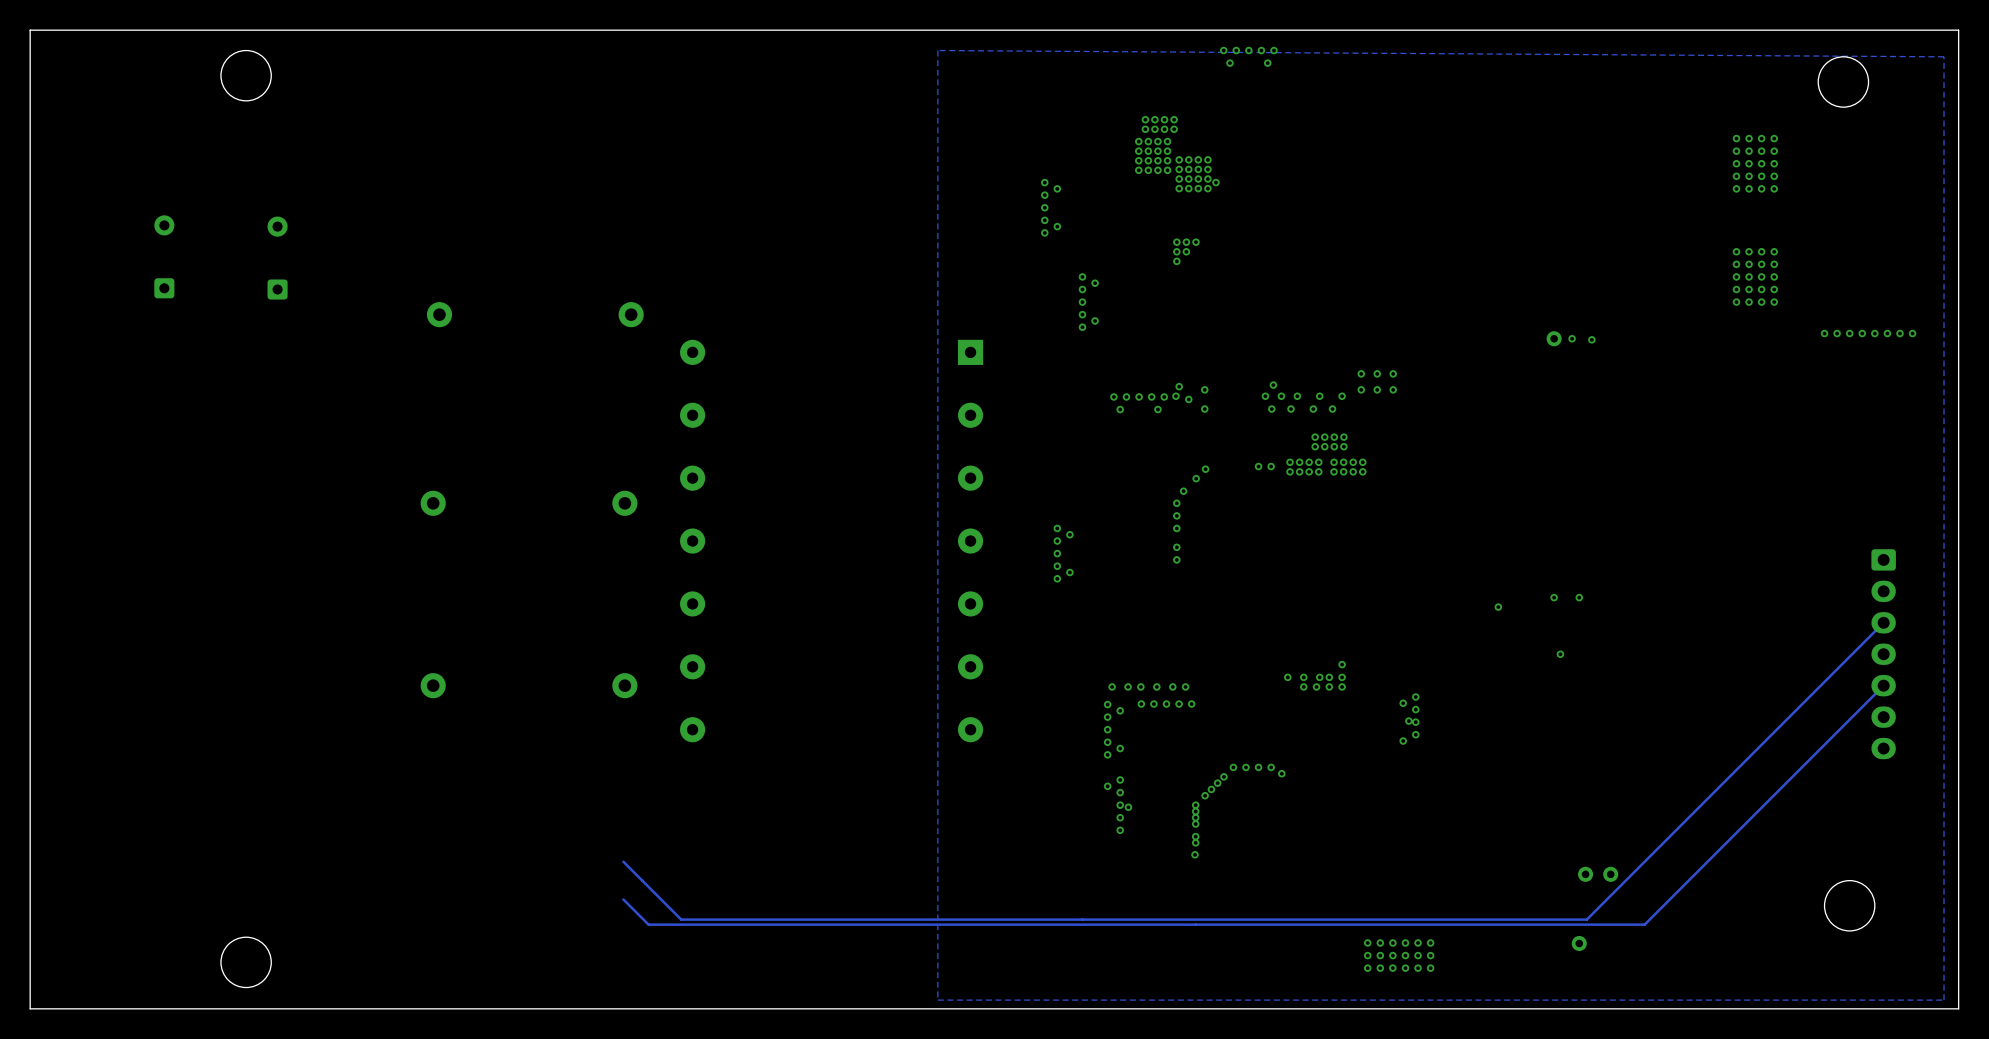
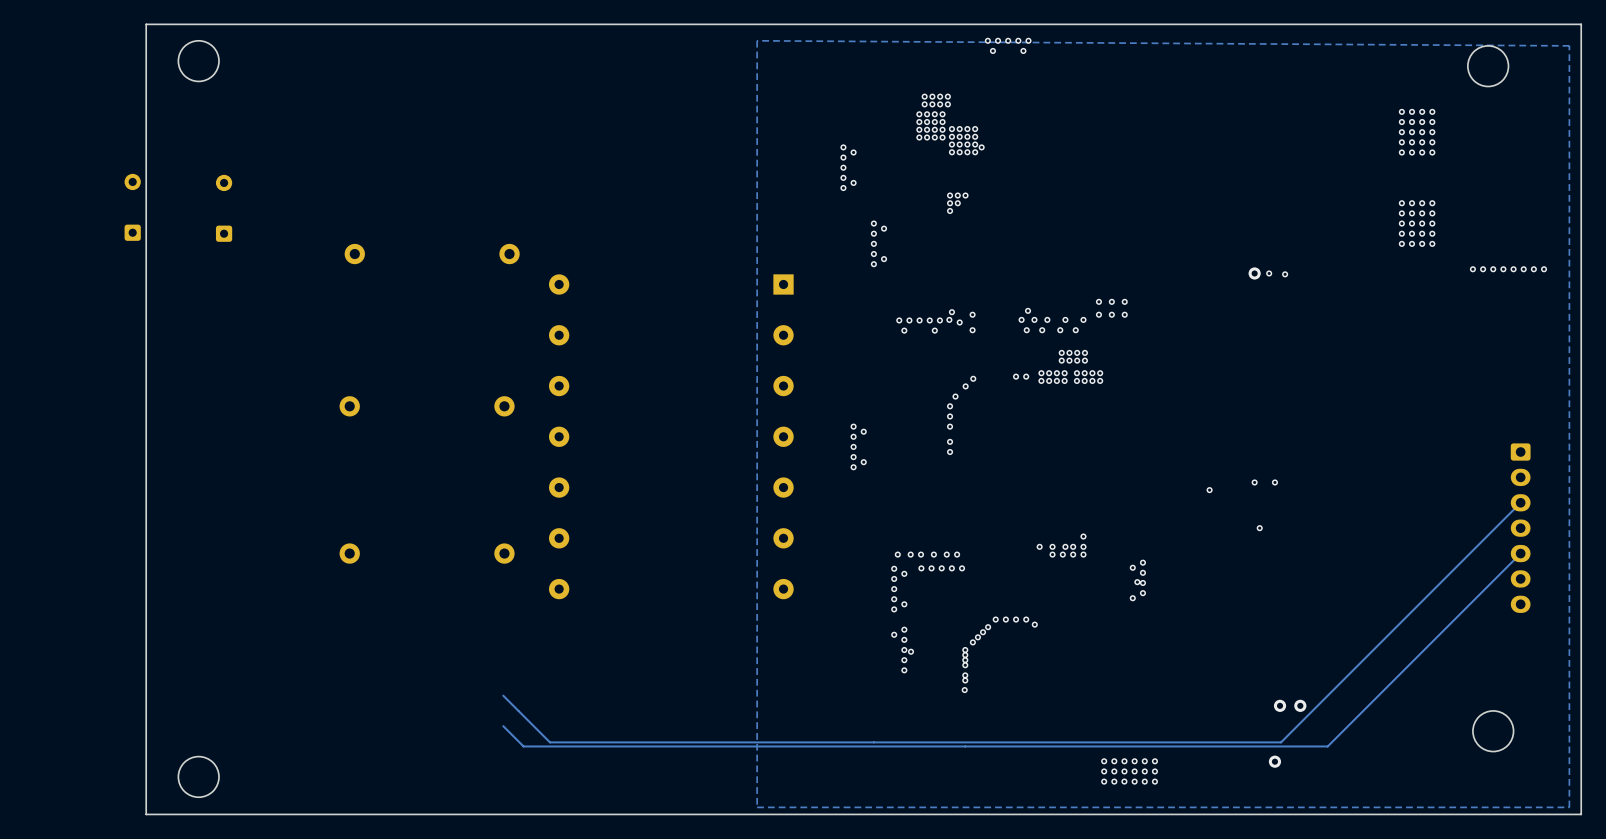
board edge: (181, 30) (30, 30) (30, 1008) (181, 1008) -> (146, 24) (146, 814)

